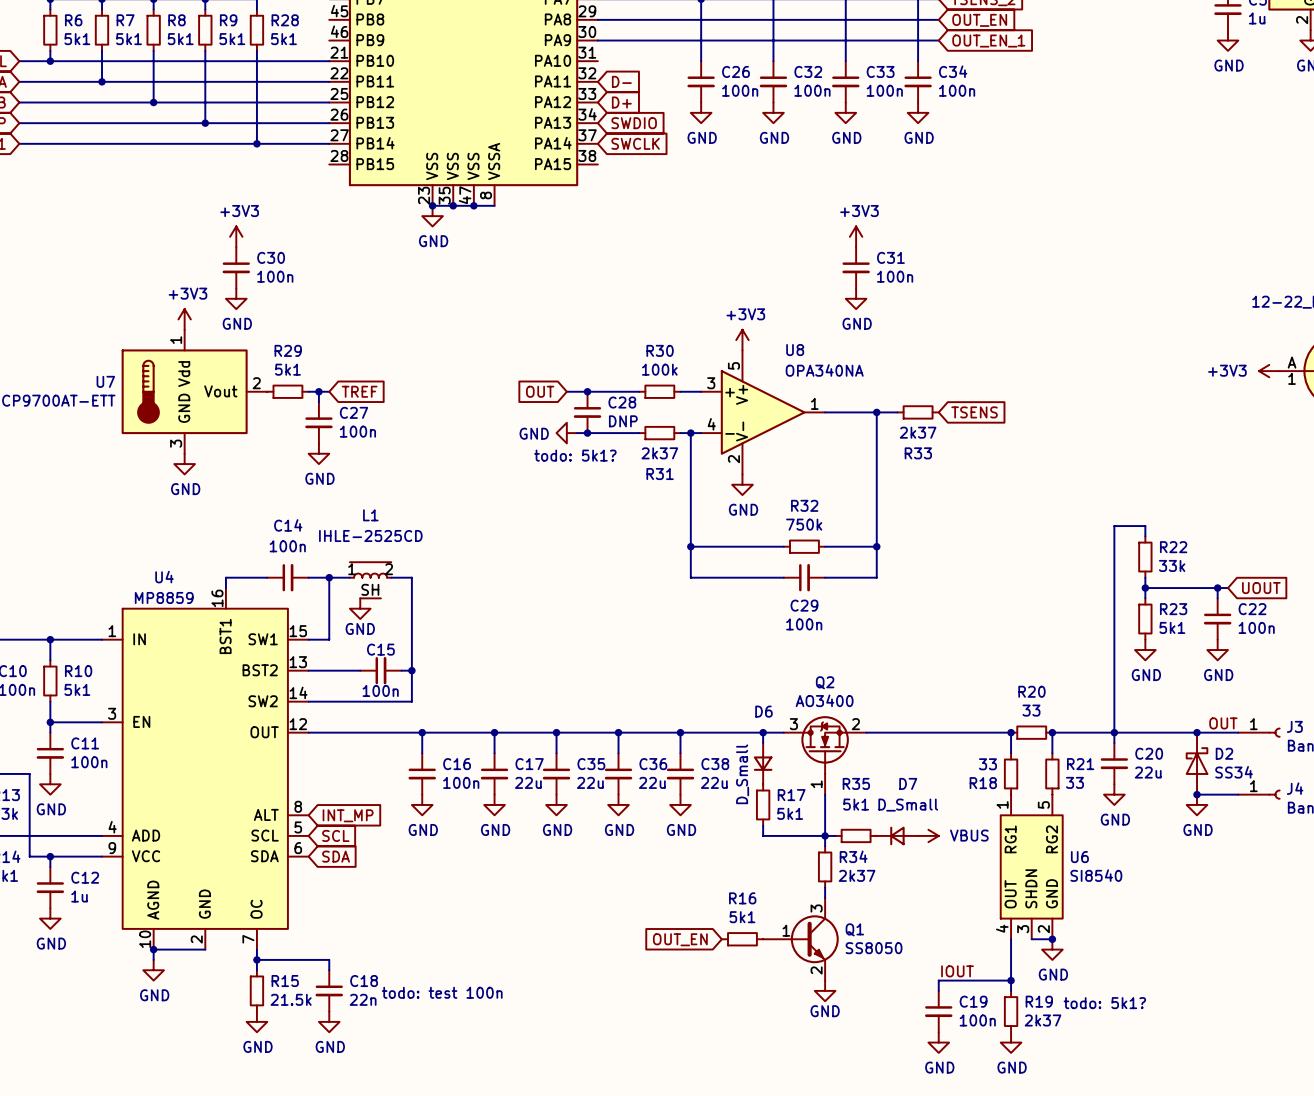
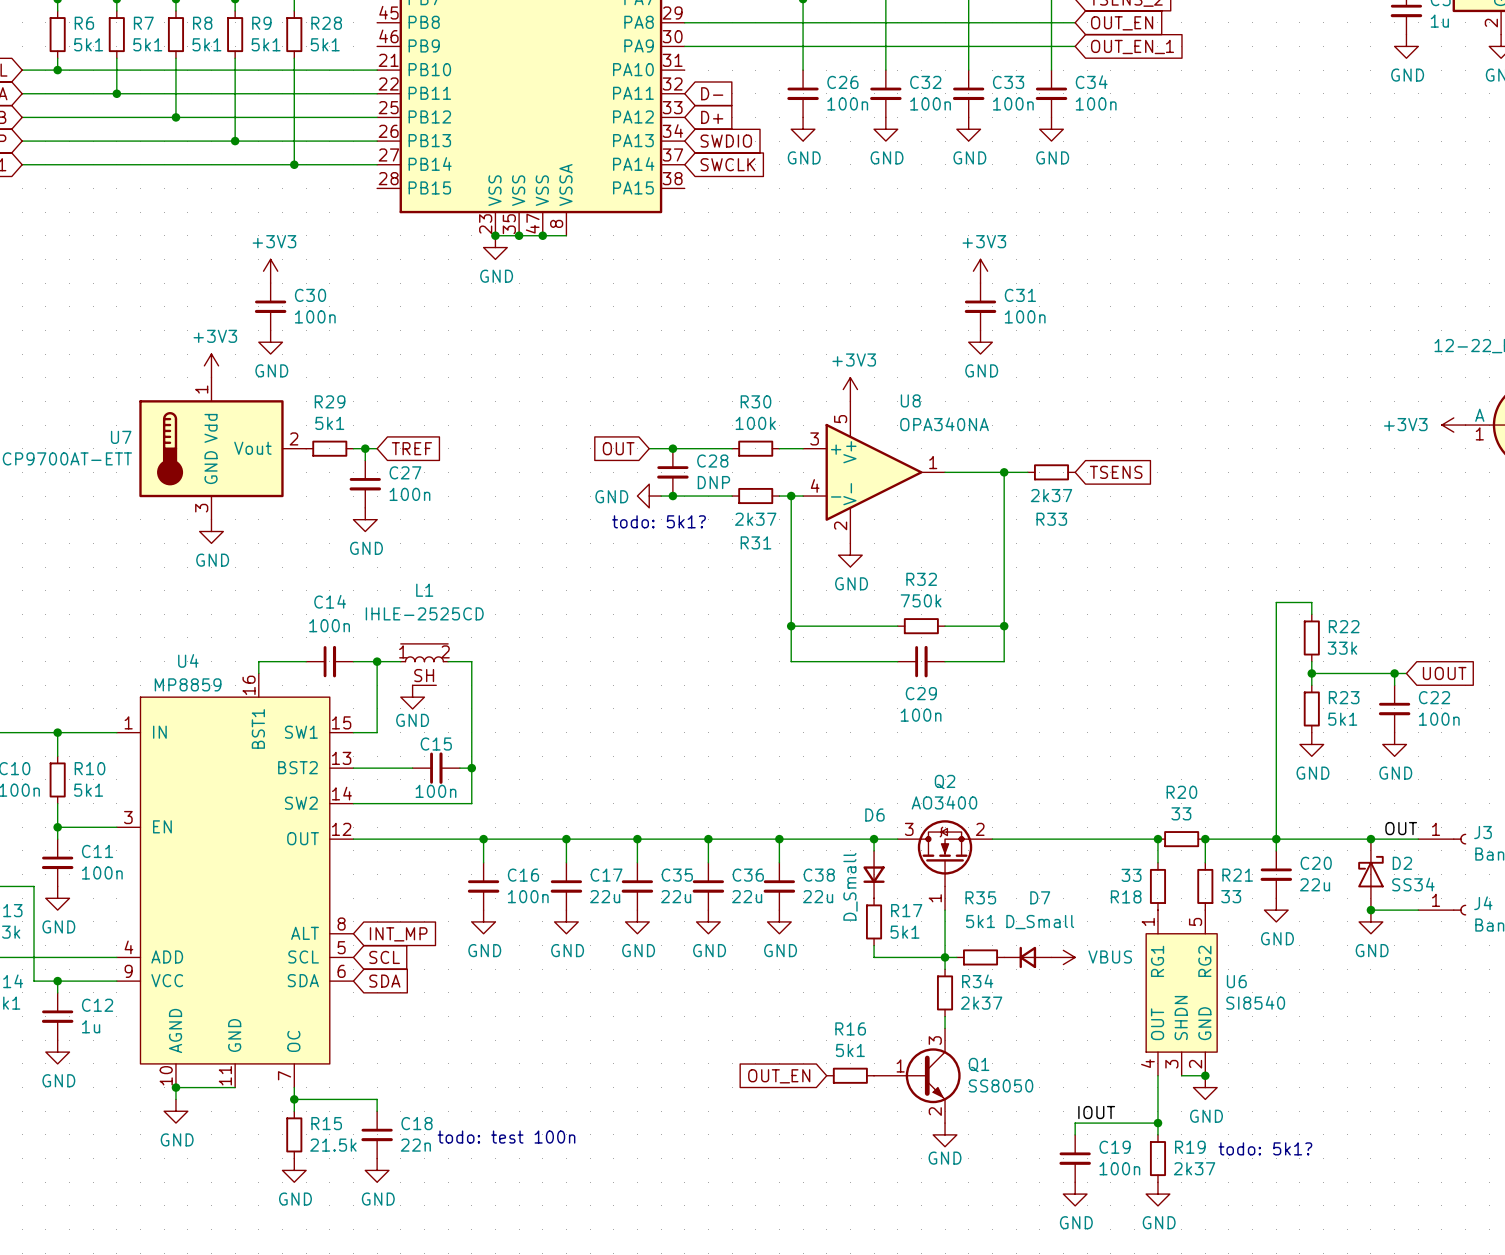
U4 pin number: 2 (196, 939) -> 11 (225, 1075)

